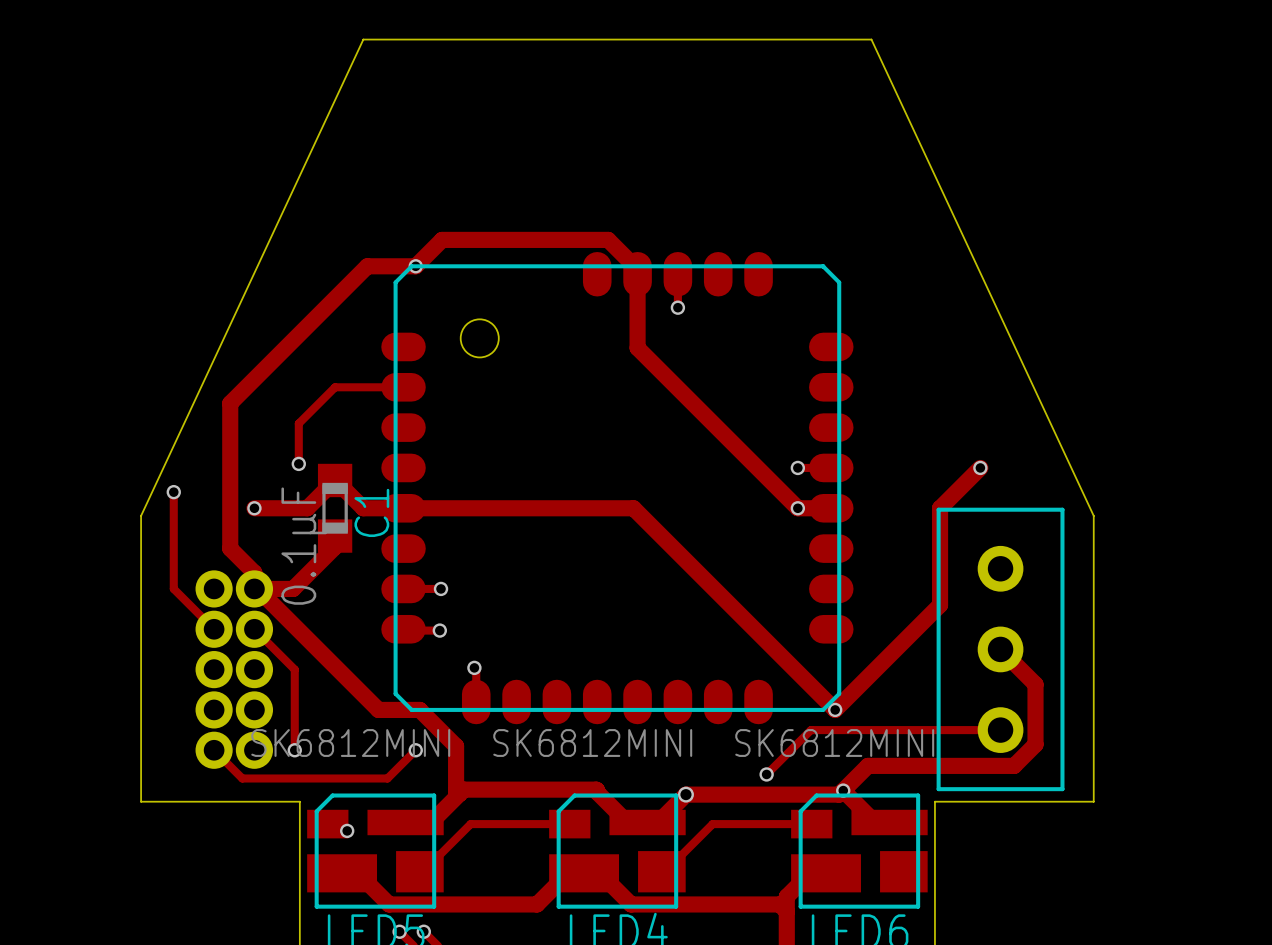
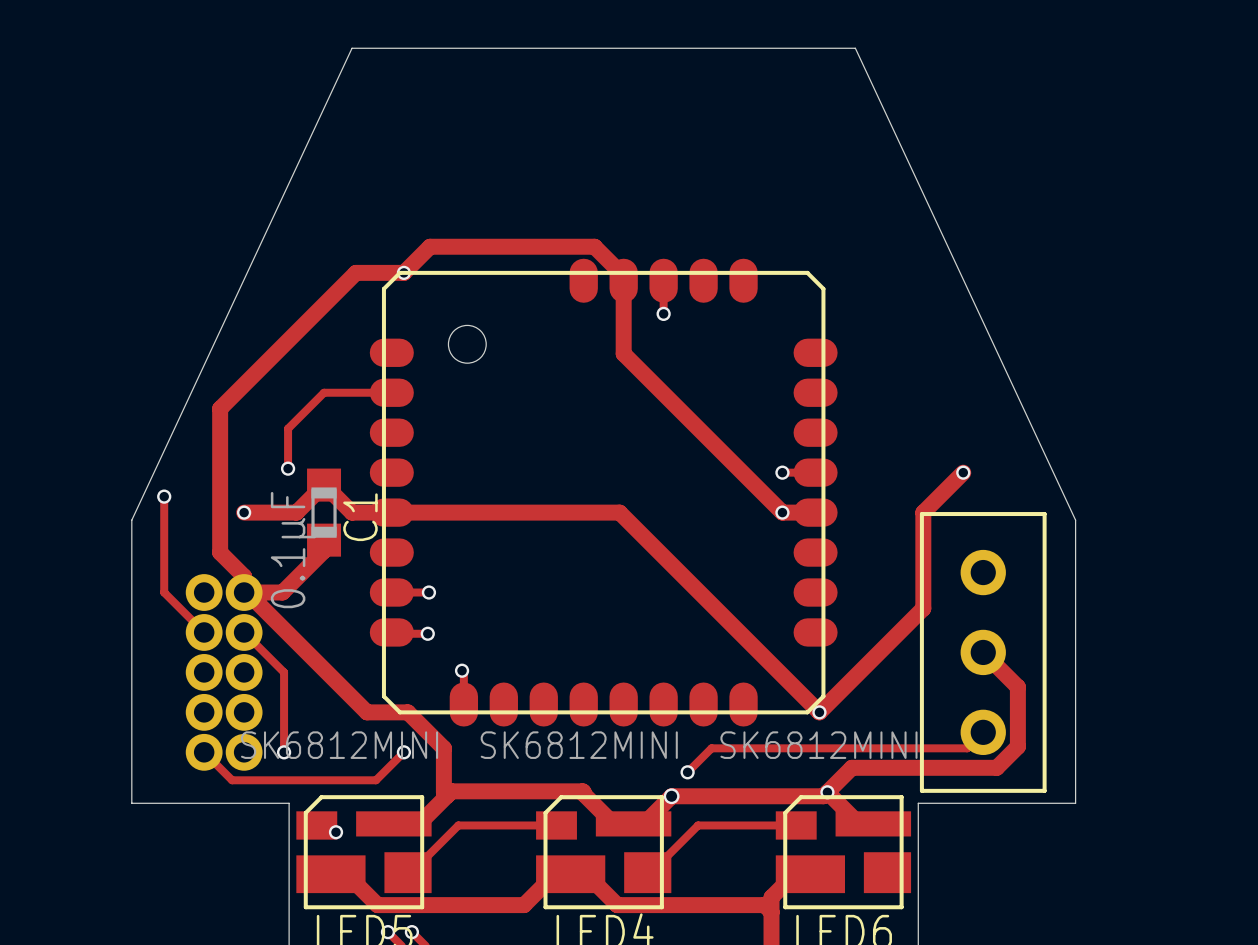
track: (1000, 730) (810, 730) (766, 774) -> (983, 732) (967, 748) (711, 748) (687, 772)
via position: (766, 774) -> (687, 772)

